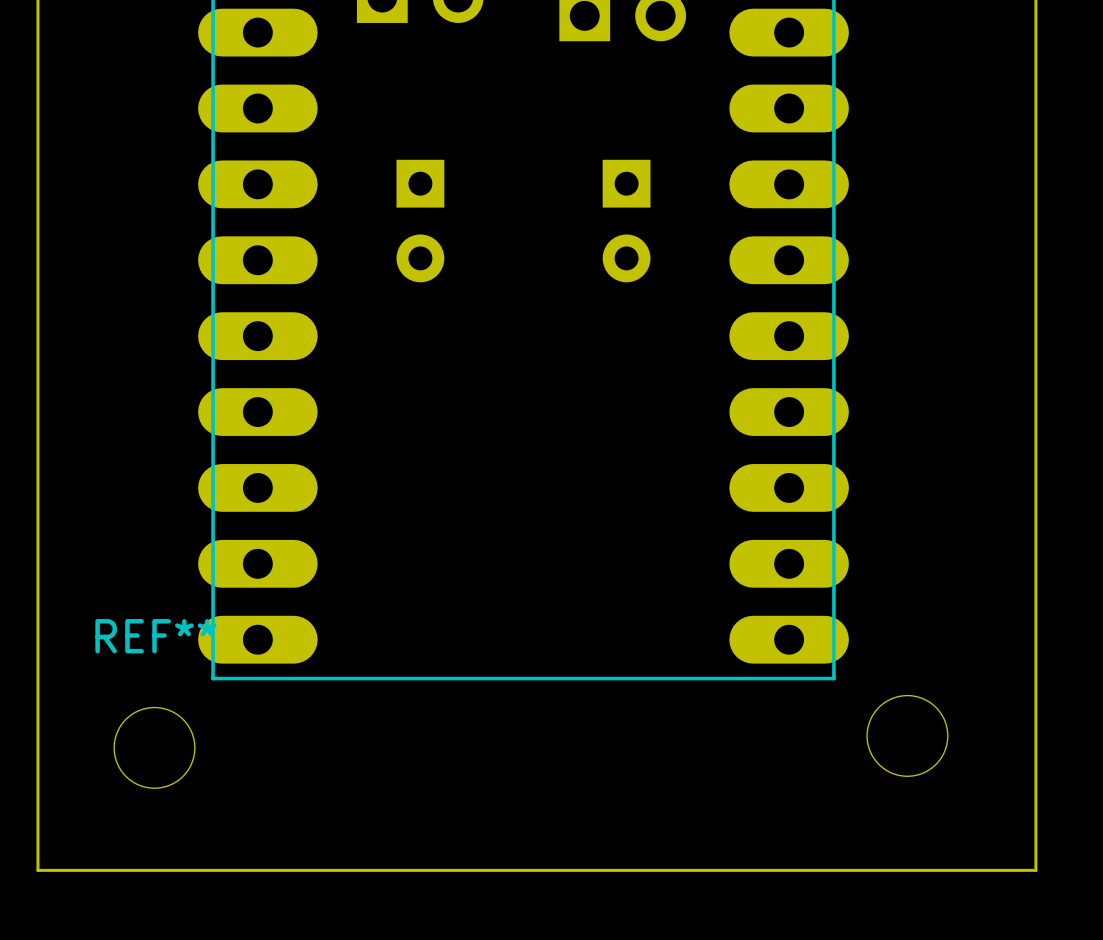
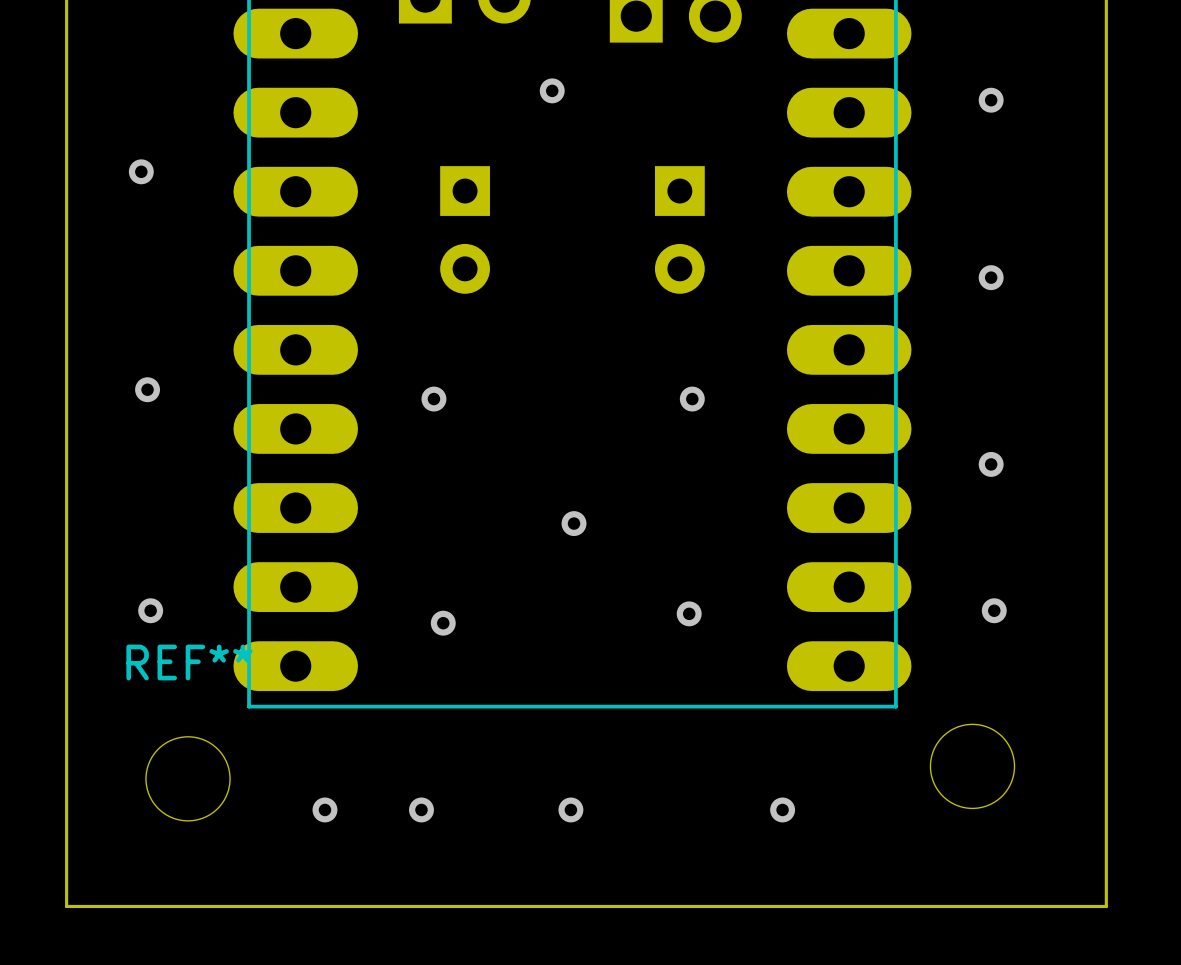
via: none -> (552, 90)
via: none -> (991, 100)
via: none -> (141, 171)
via: none -> (991, 277)
via: none -> (147, 389)
via: none -> (433, 399)
via: none -> (692, 399)
via: none -> (991, 464)
via: none -> (574, 523)
via: none -> (150, 610)
via: none -> (994, 610)
via: none -> (689, 613)
via: none -> (443, 623)
via: none -> (324, 809)
via: none -> (421, 809)
via: none -> (570, 809)
via: none -> (782, 809)

